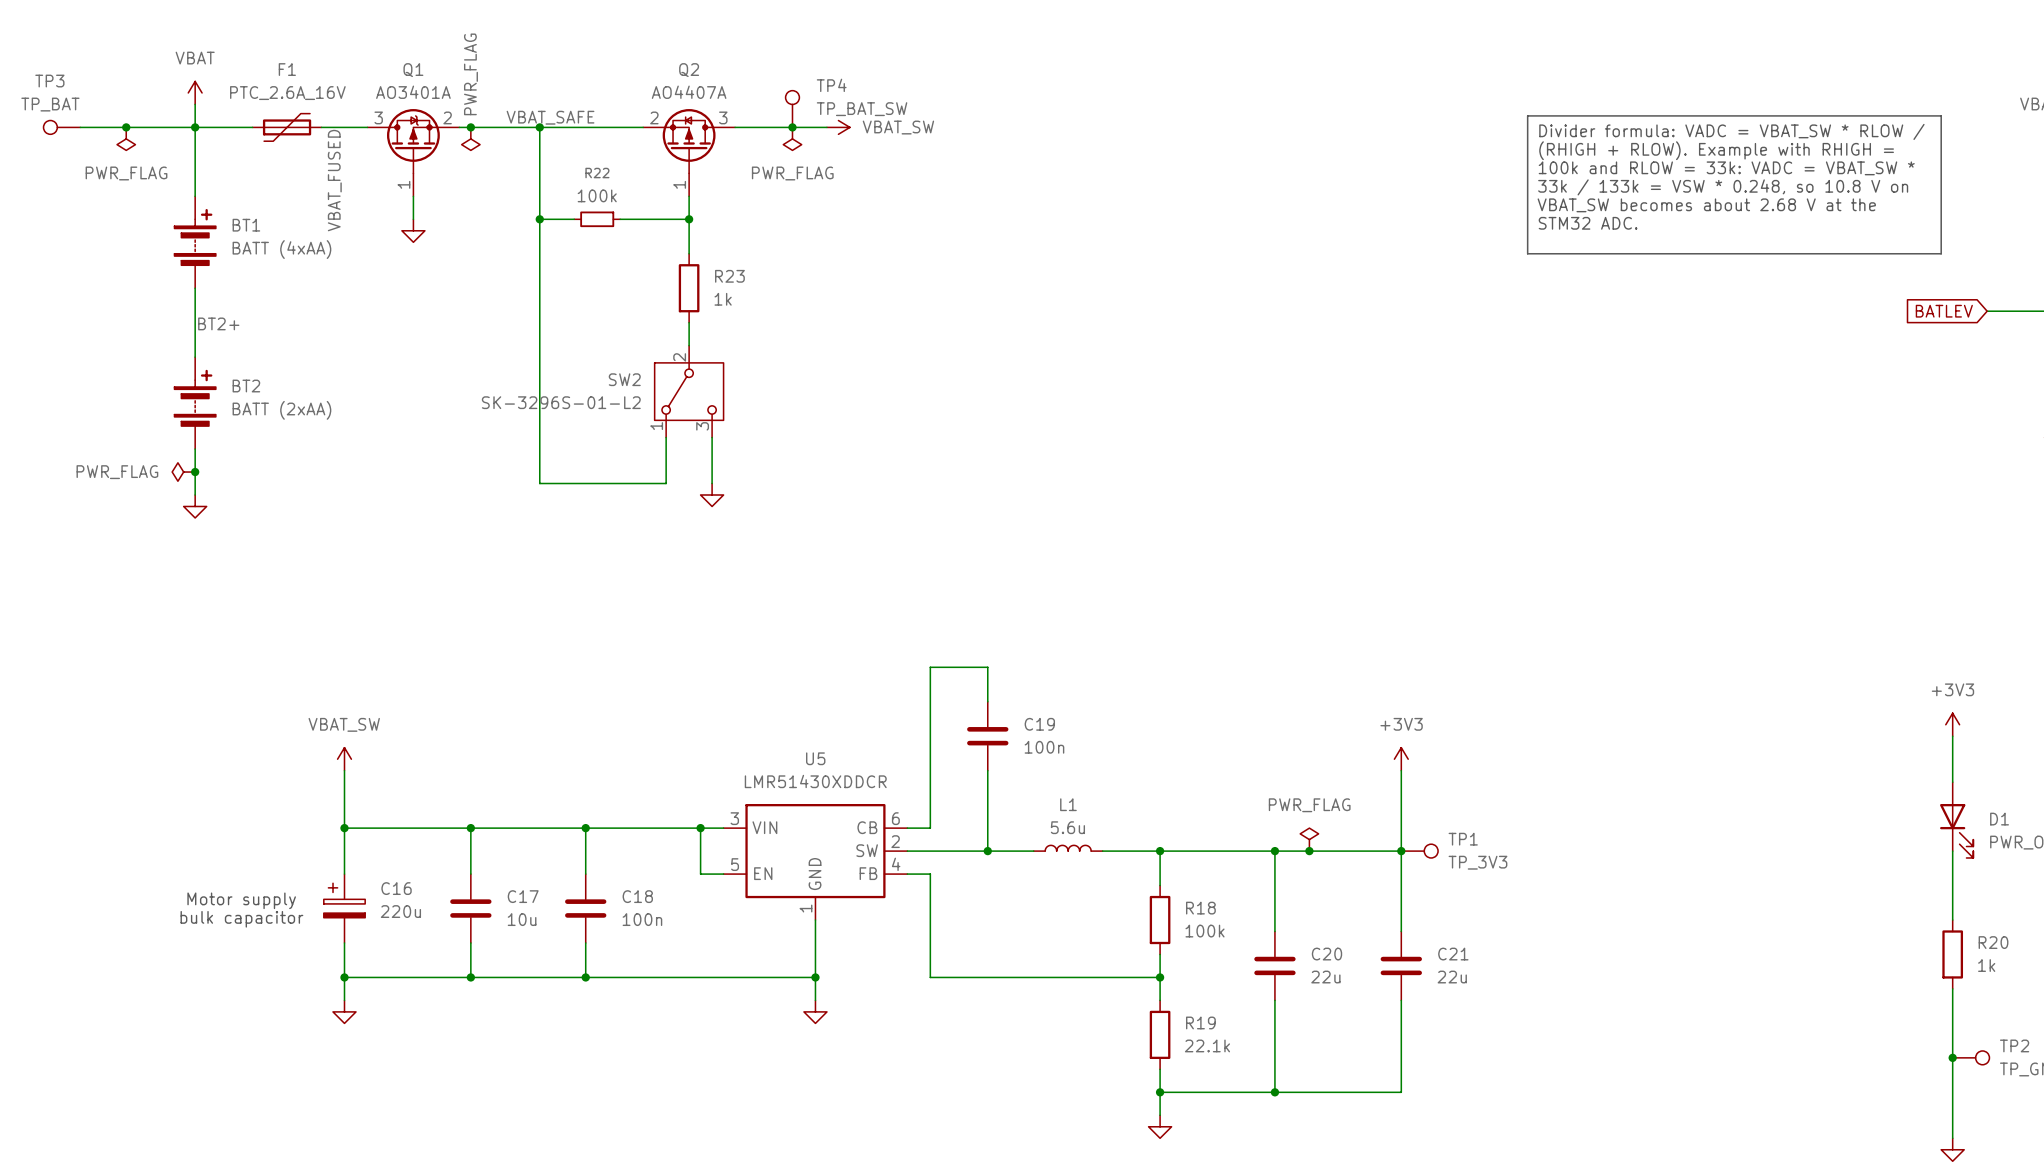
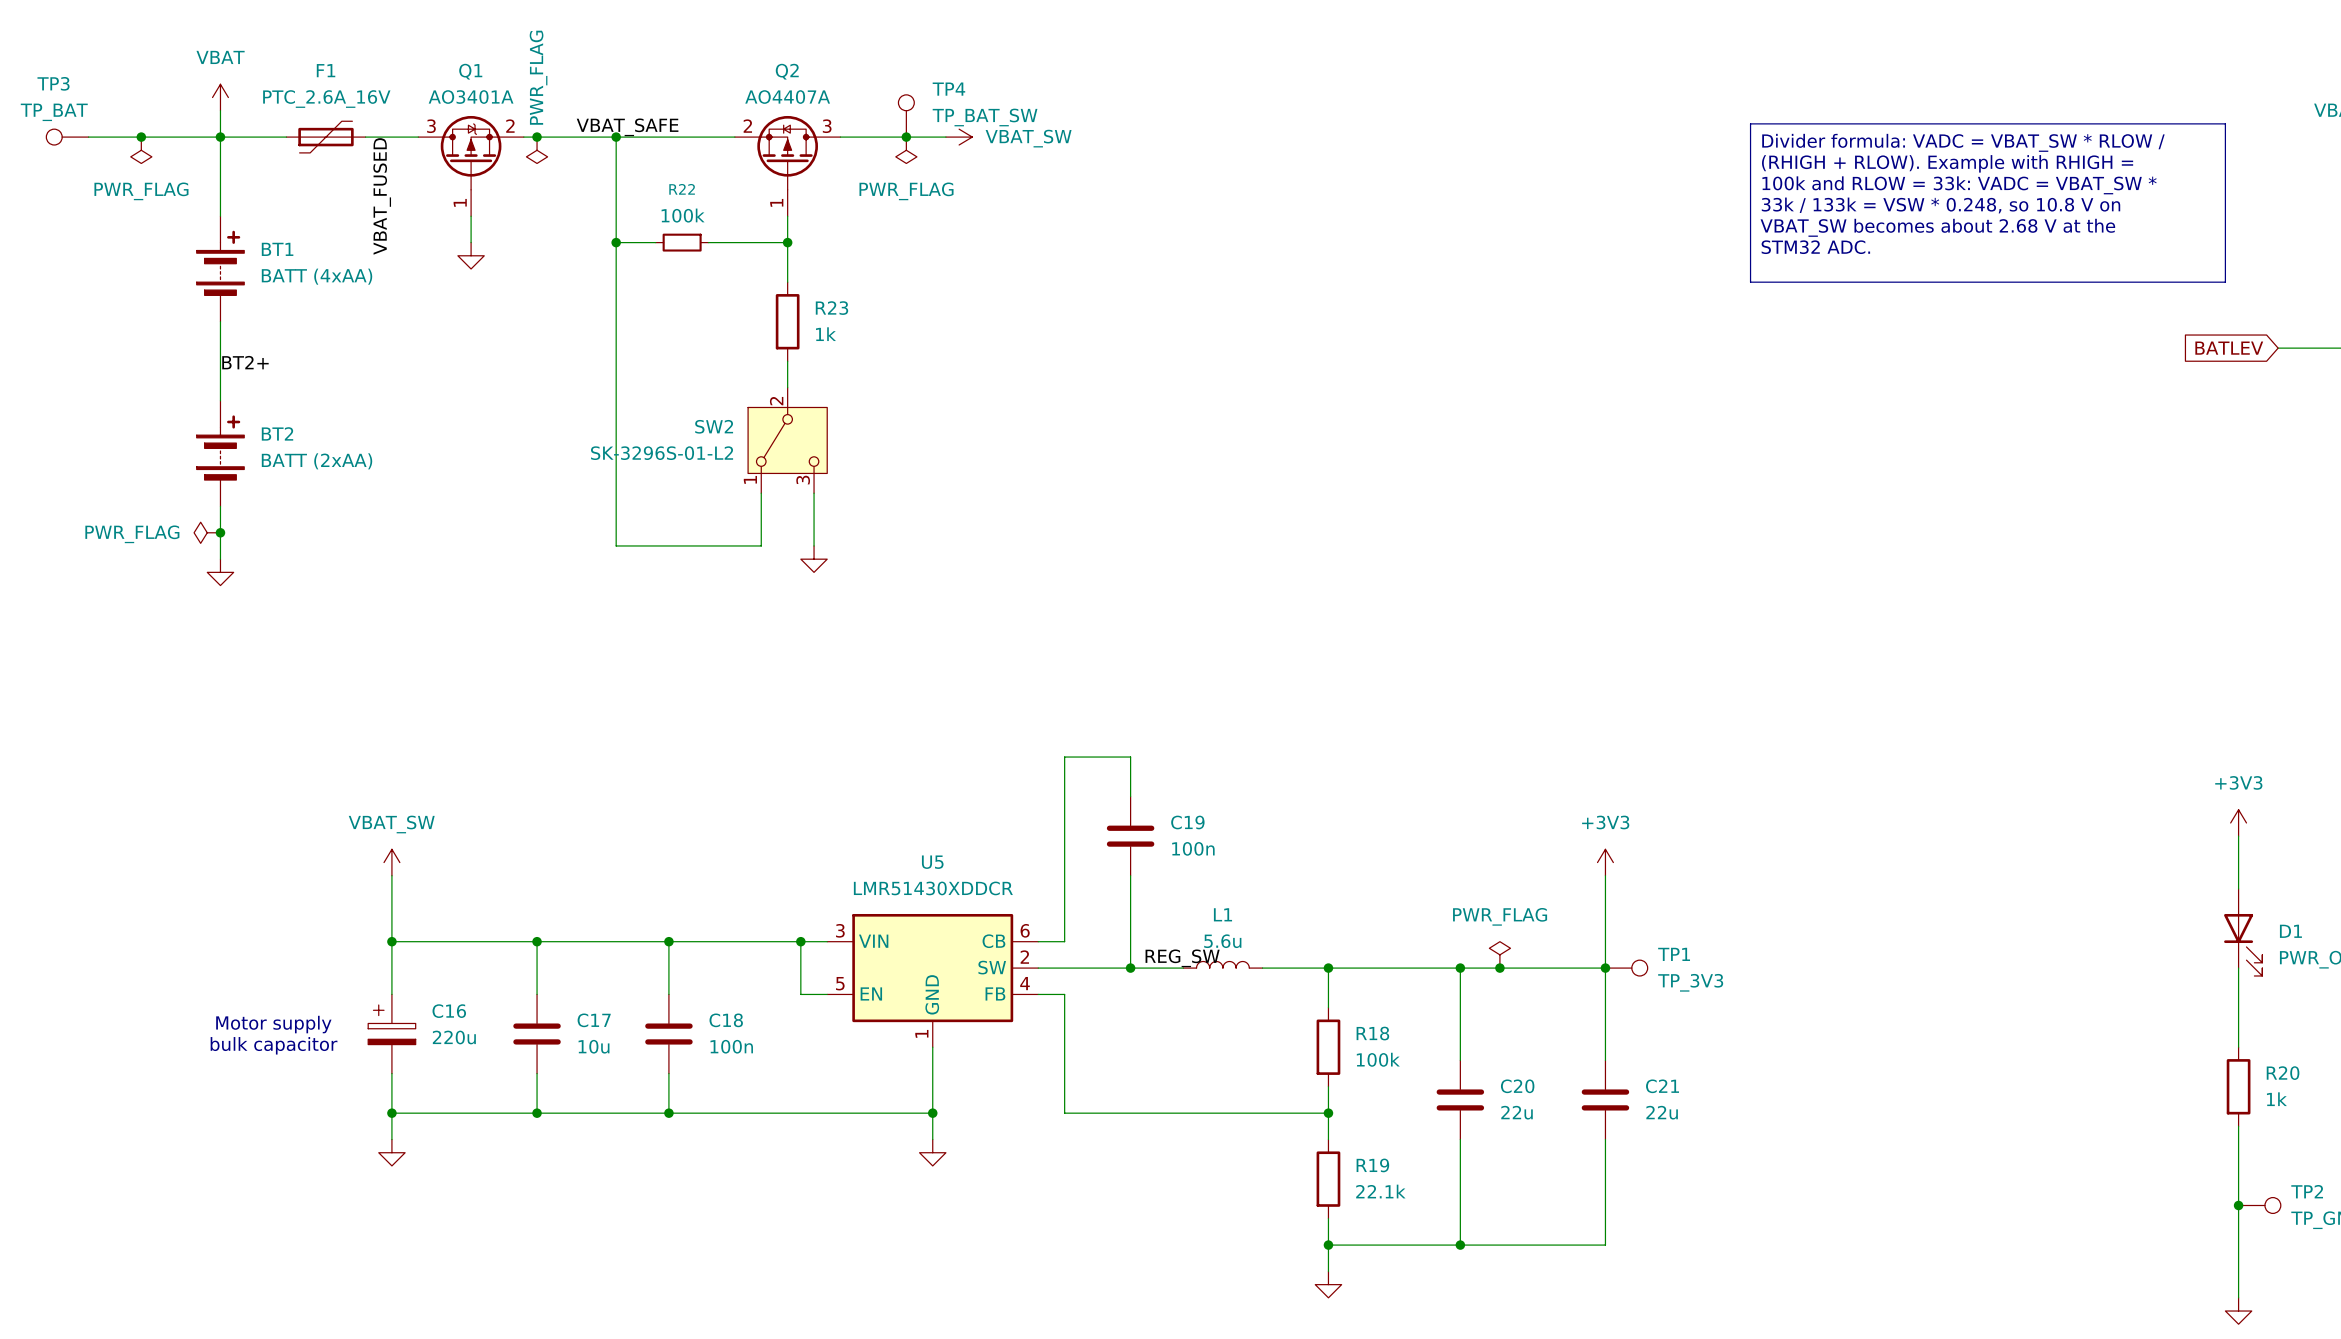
label: none -> REG_SW (1182, 958)

